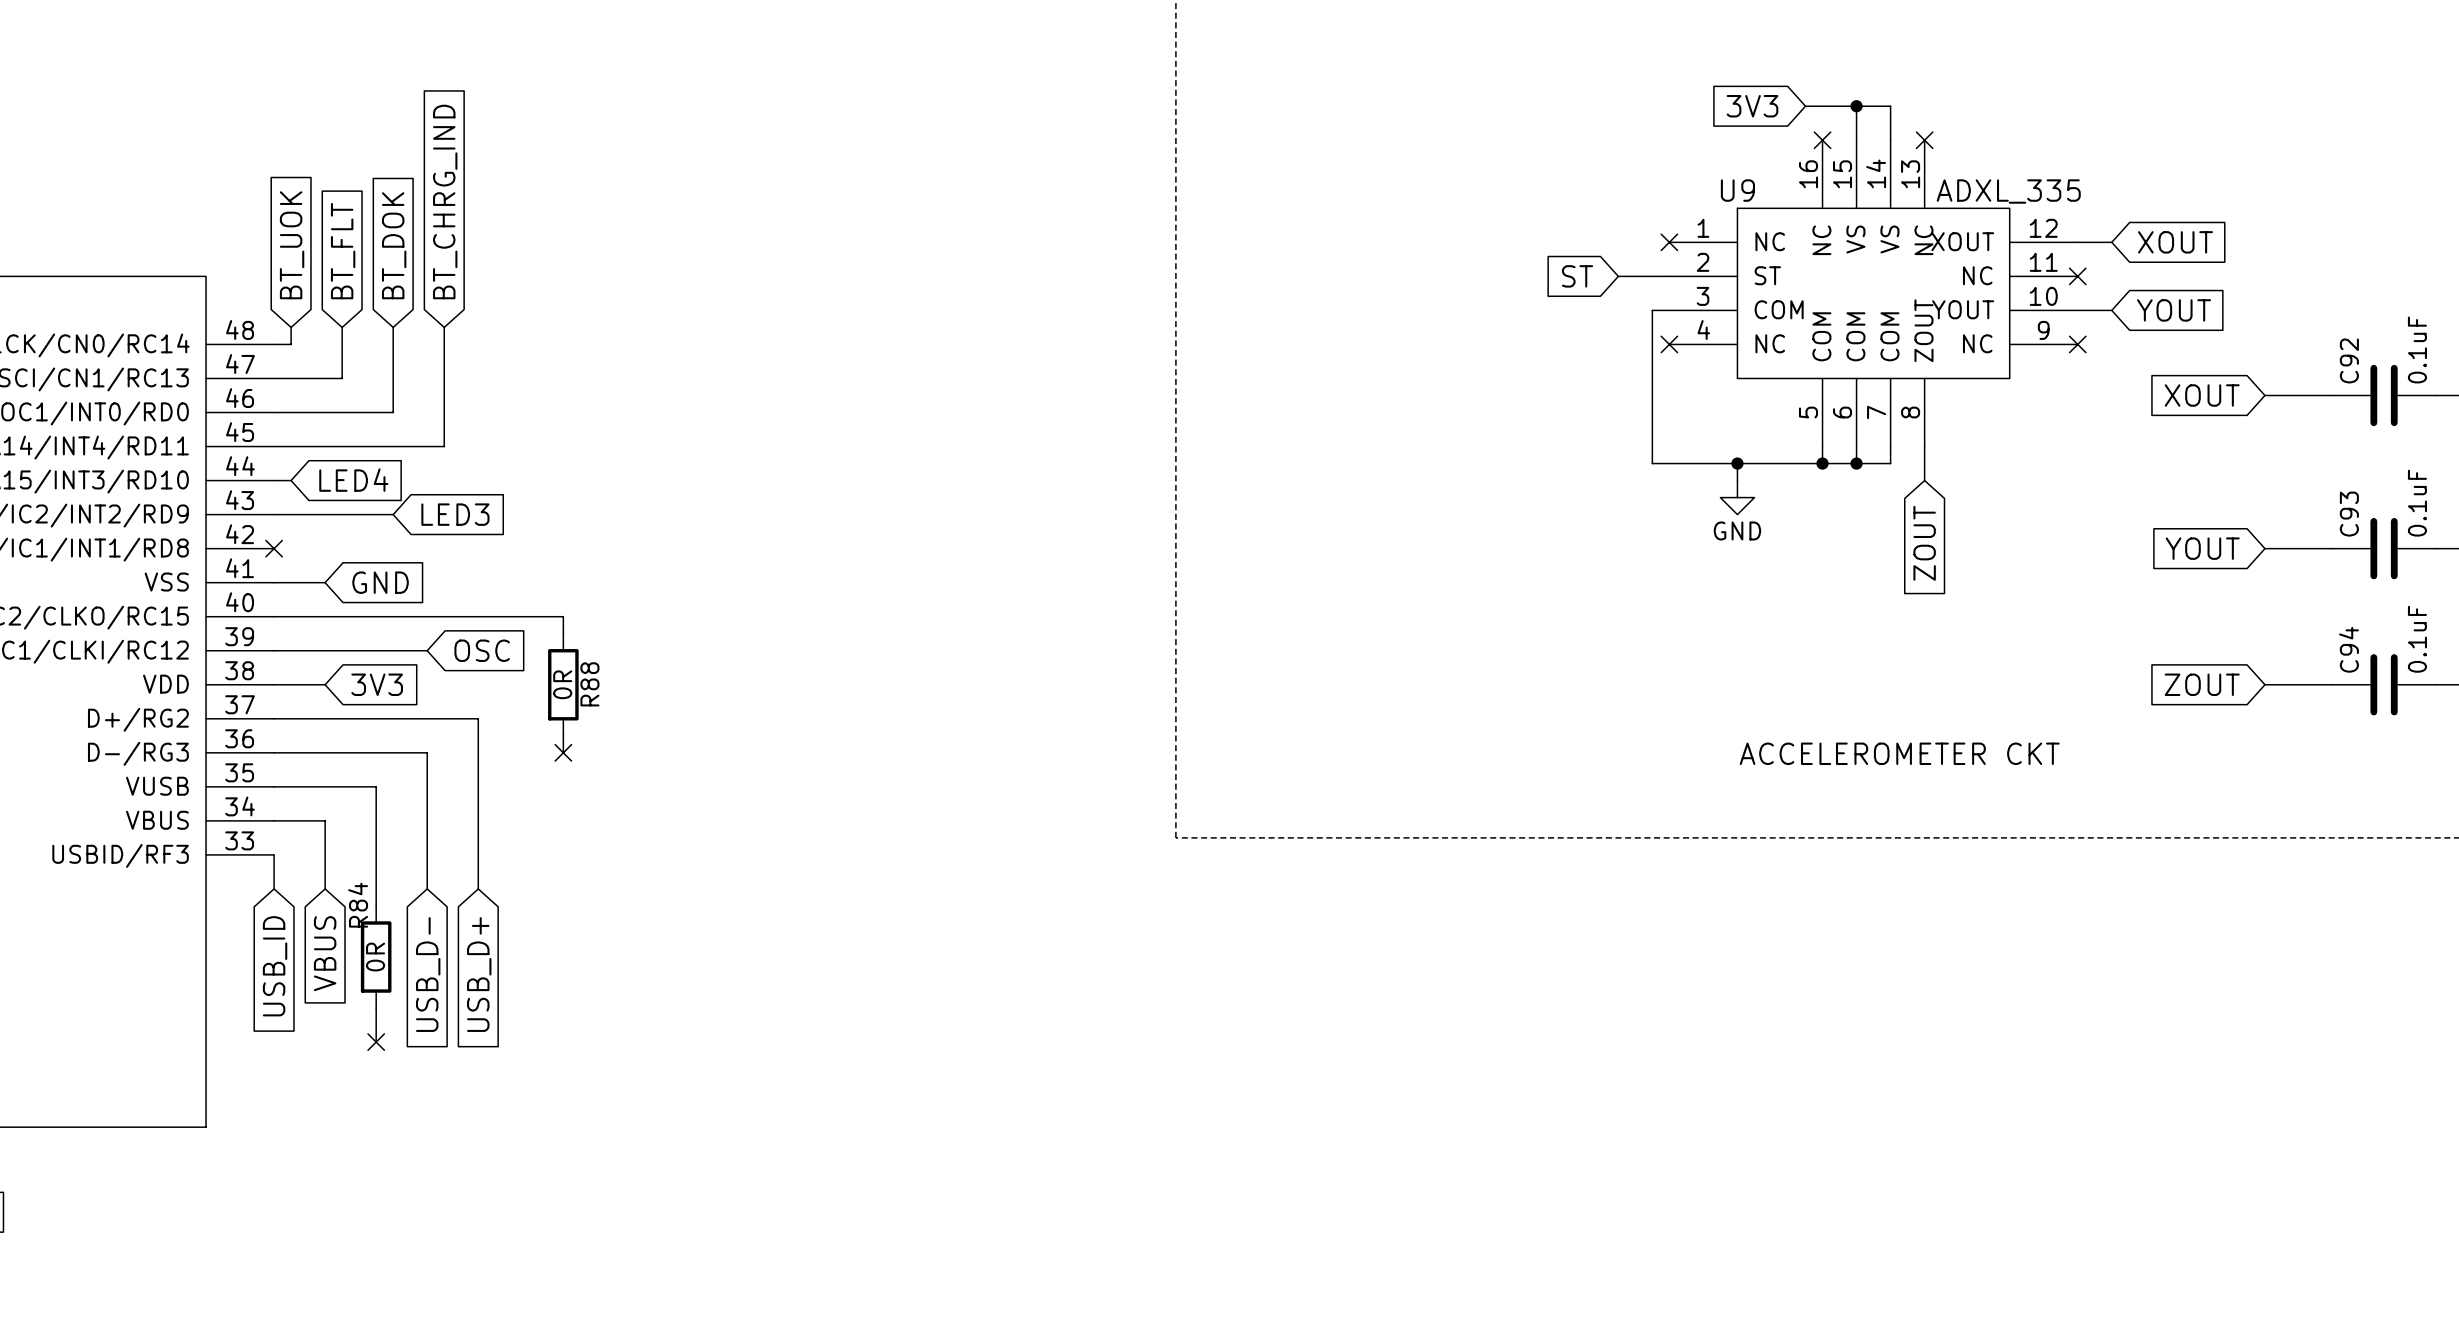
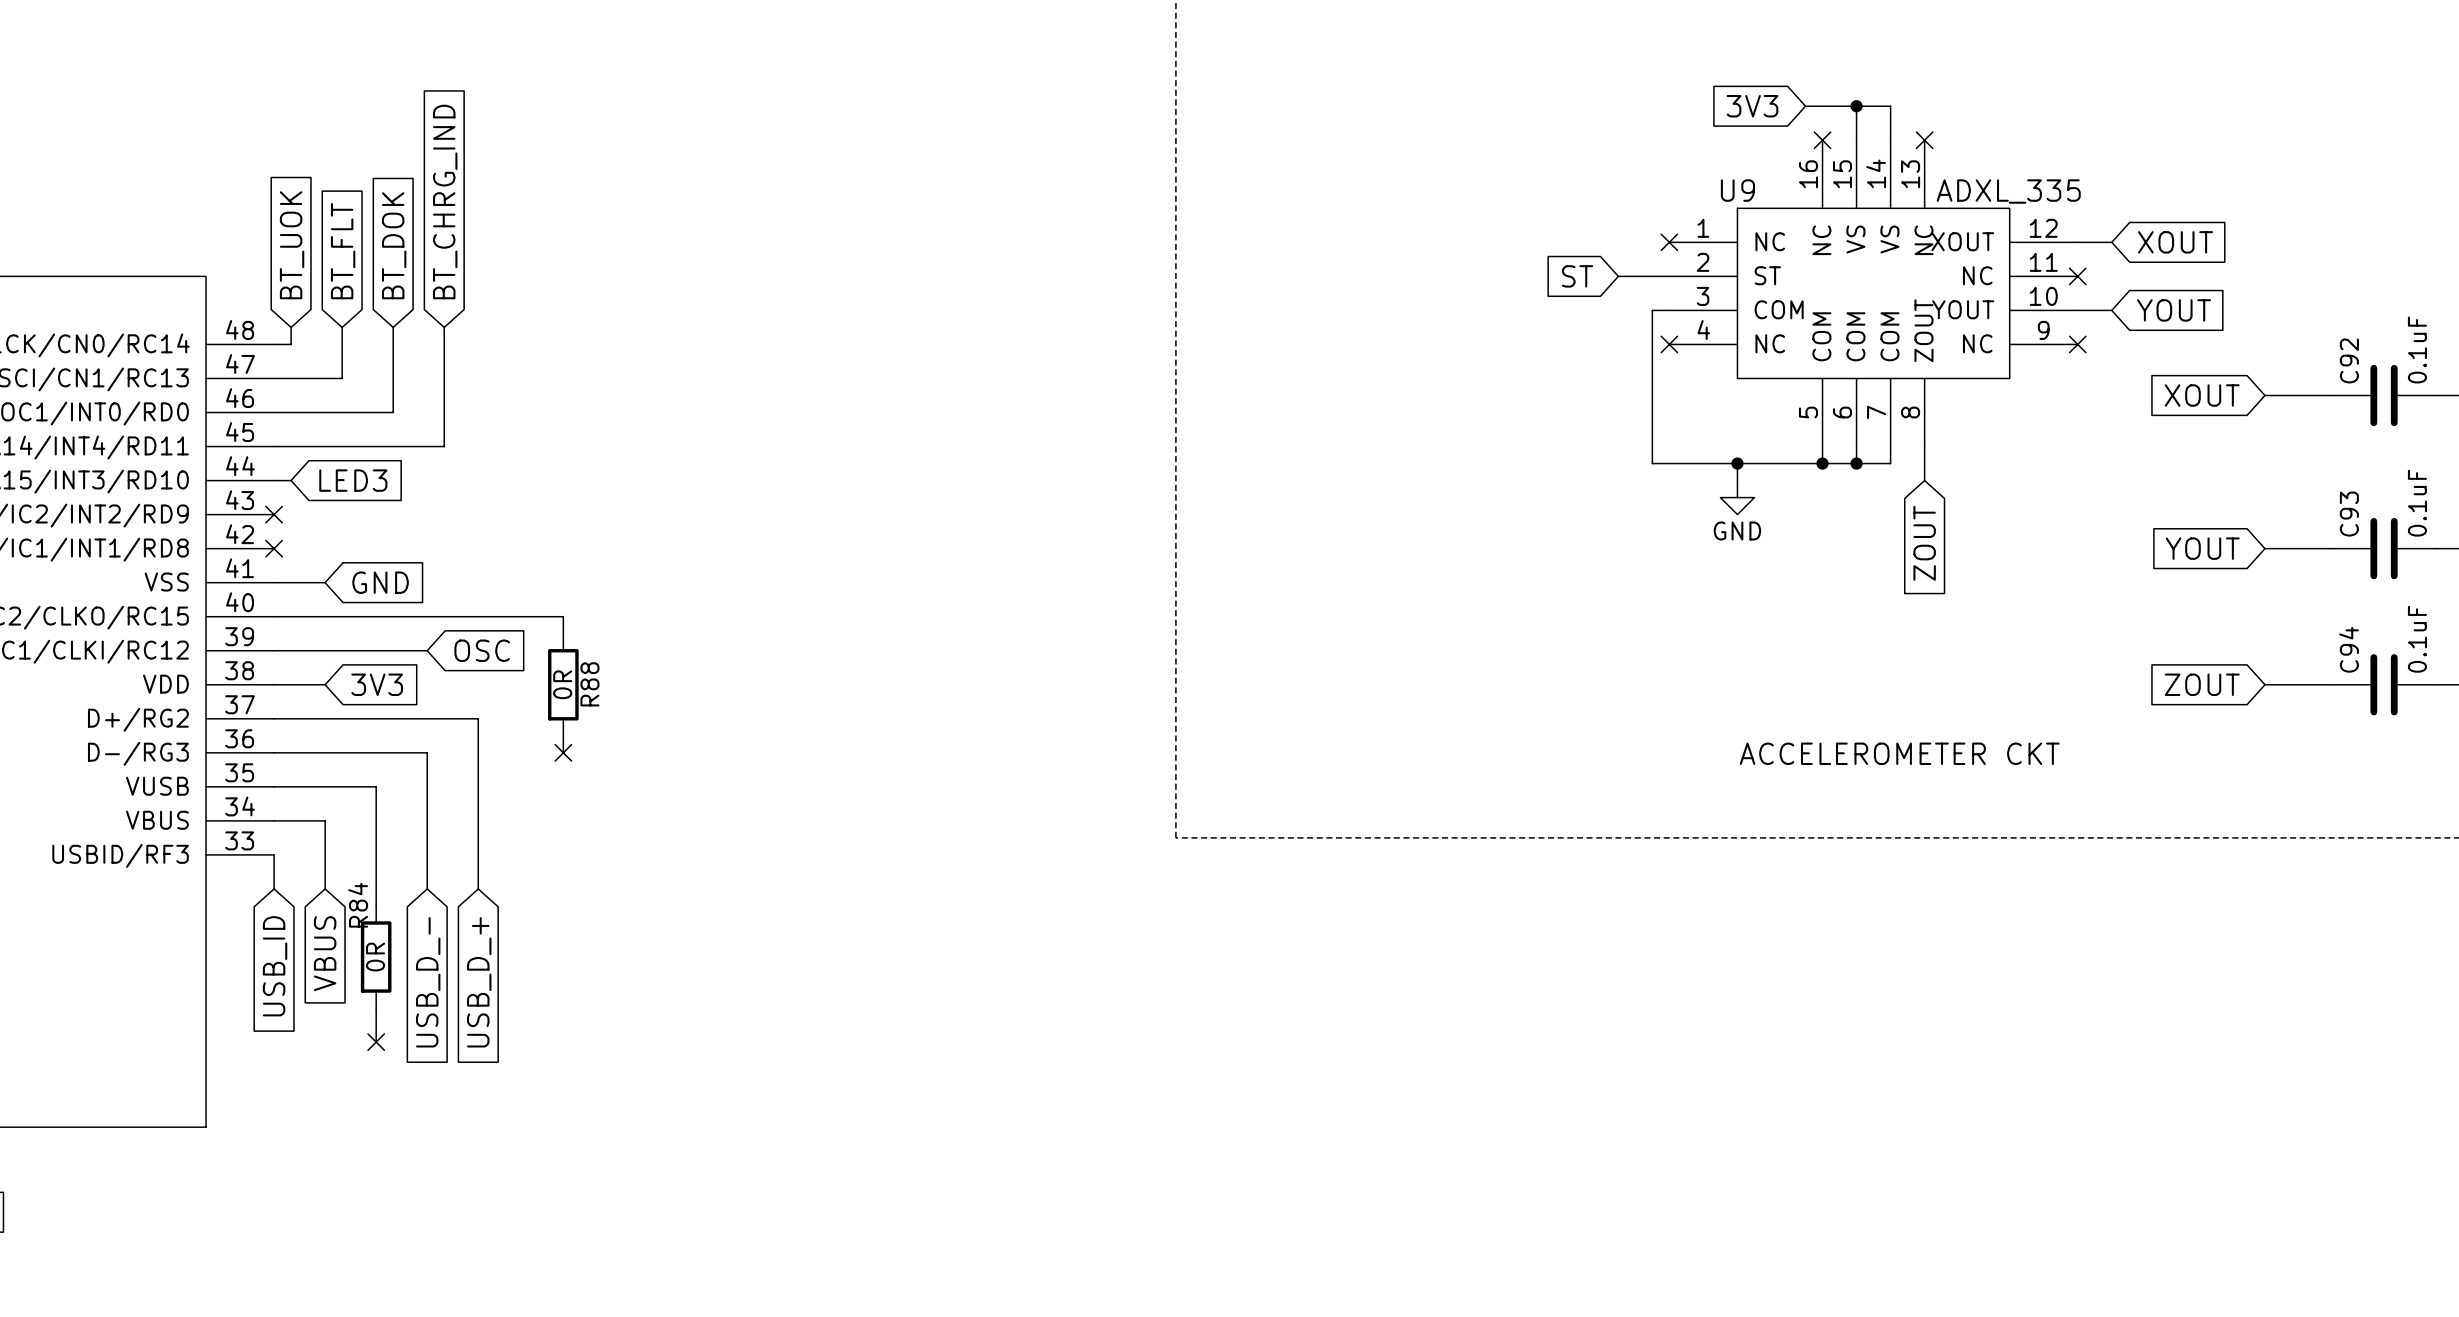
global label: LED4 (353, 480) -> LED3 (353, 480)
wire: (274, 514) (393, 514) -> none
no-connect mark: none -> (274, 514)
global label: LED3 (455, 514) -> none
global label: USB_D- (428, 974) -> USB_D_- (428, 982)
global label: USB_D+ (479, 974) -> USB_D_+ (479, 982)

